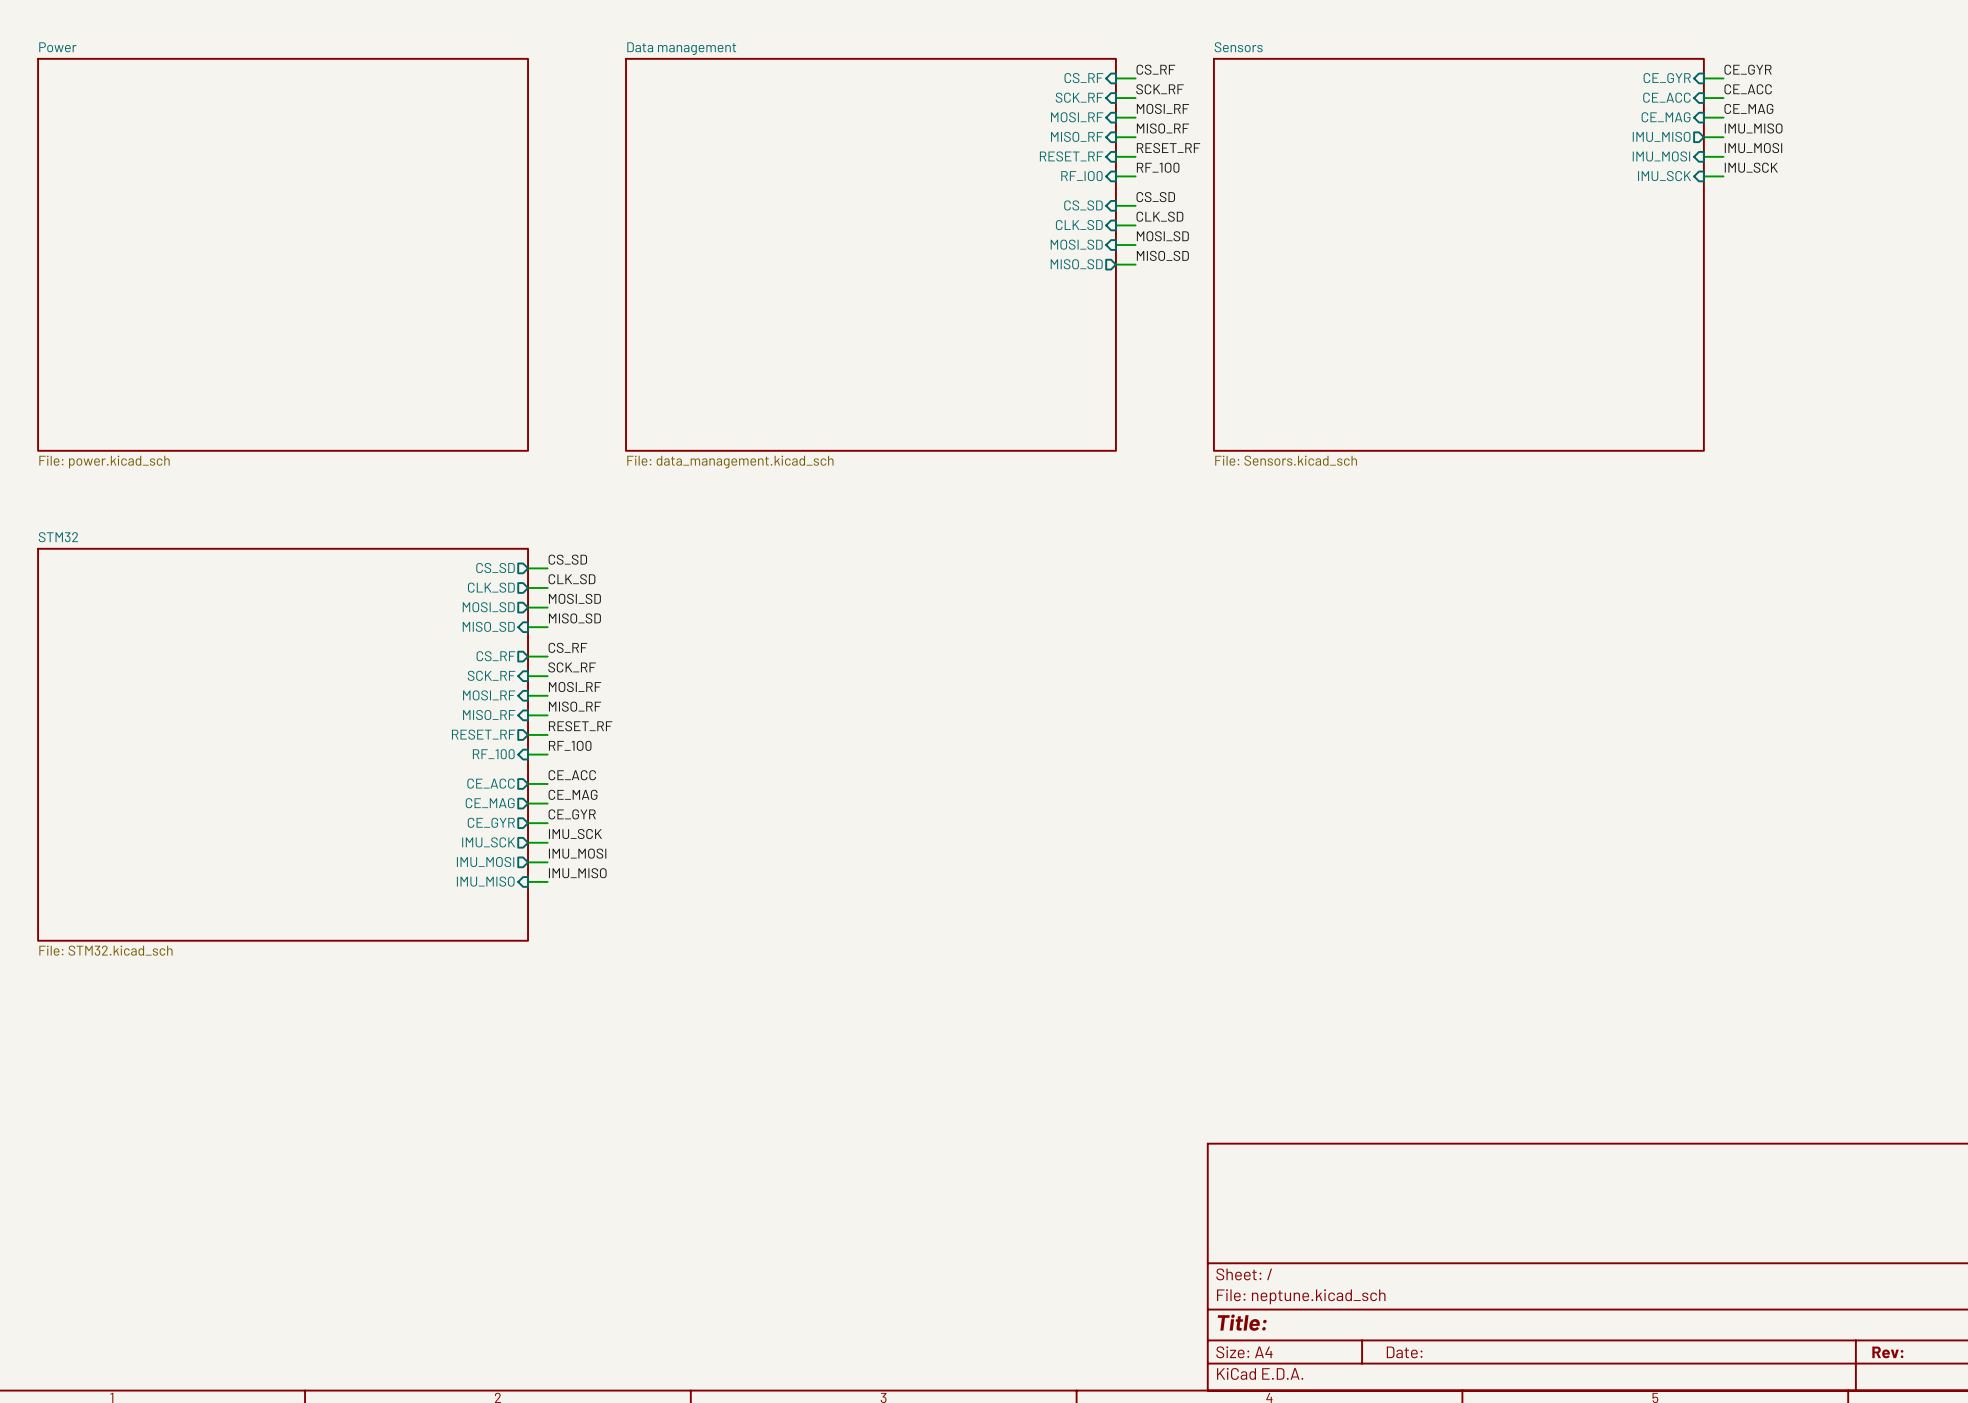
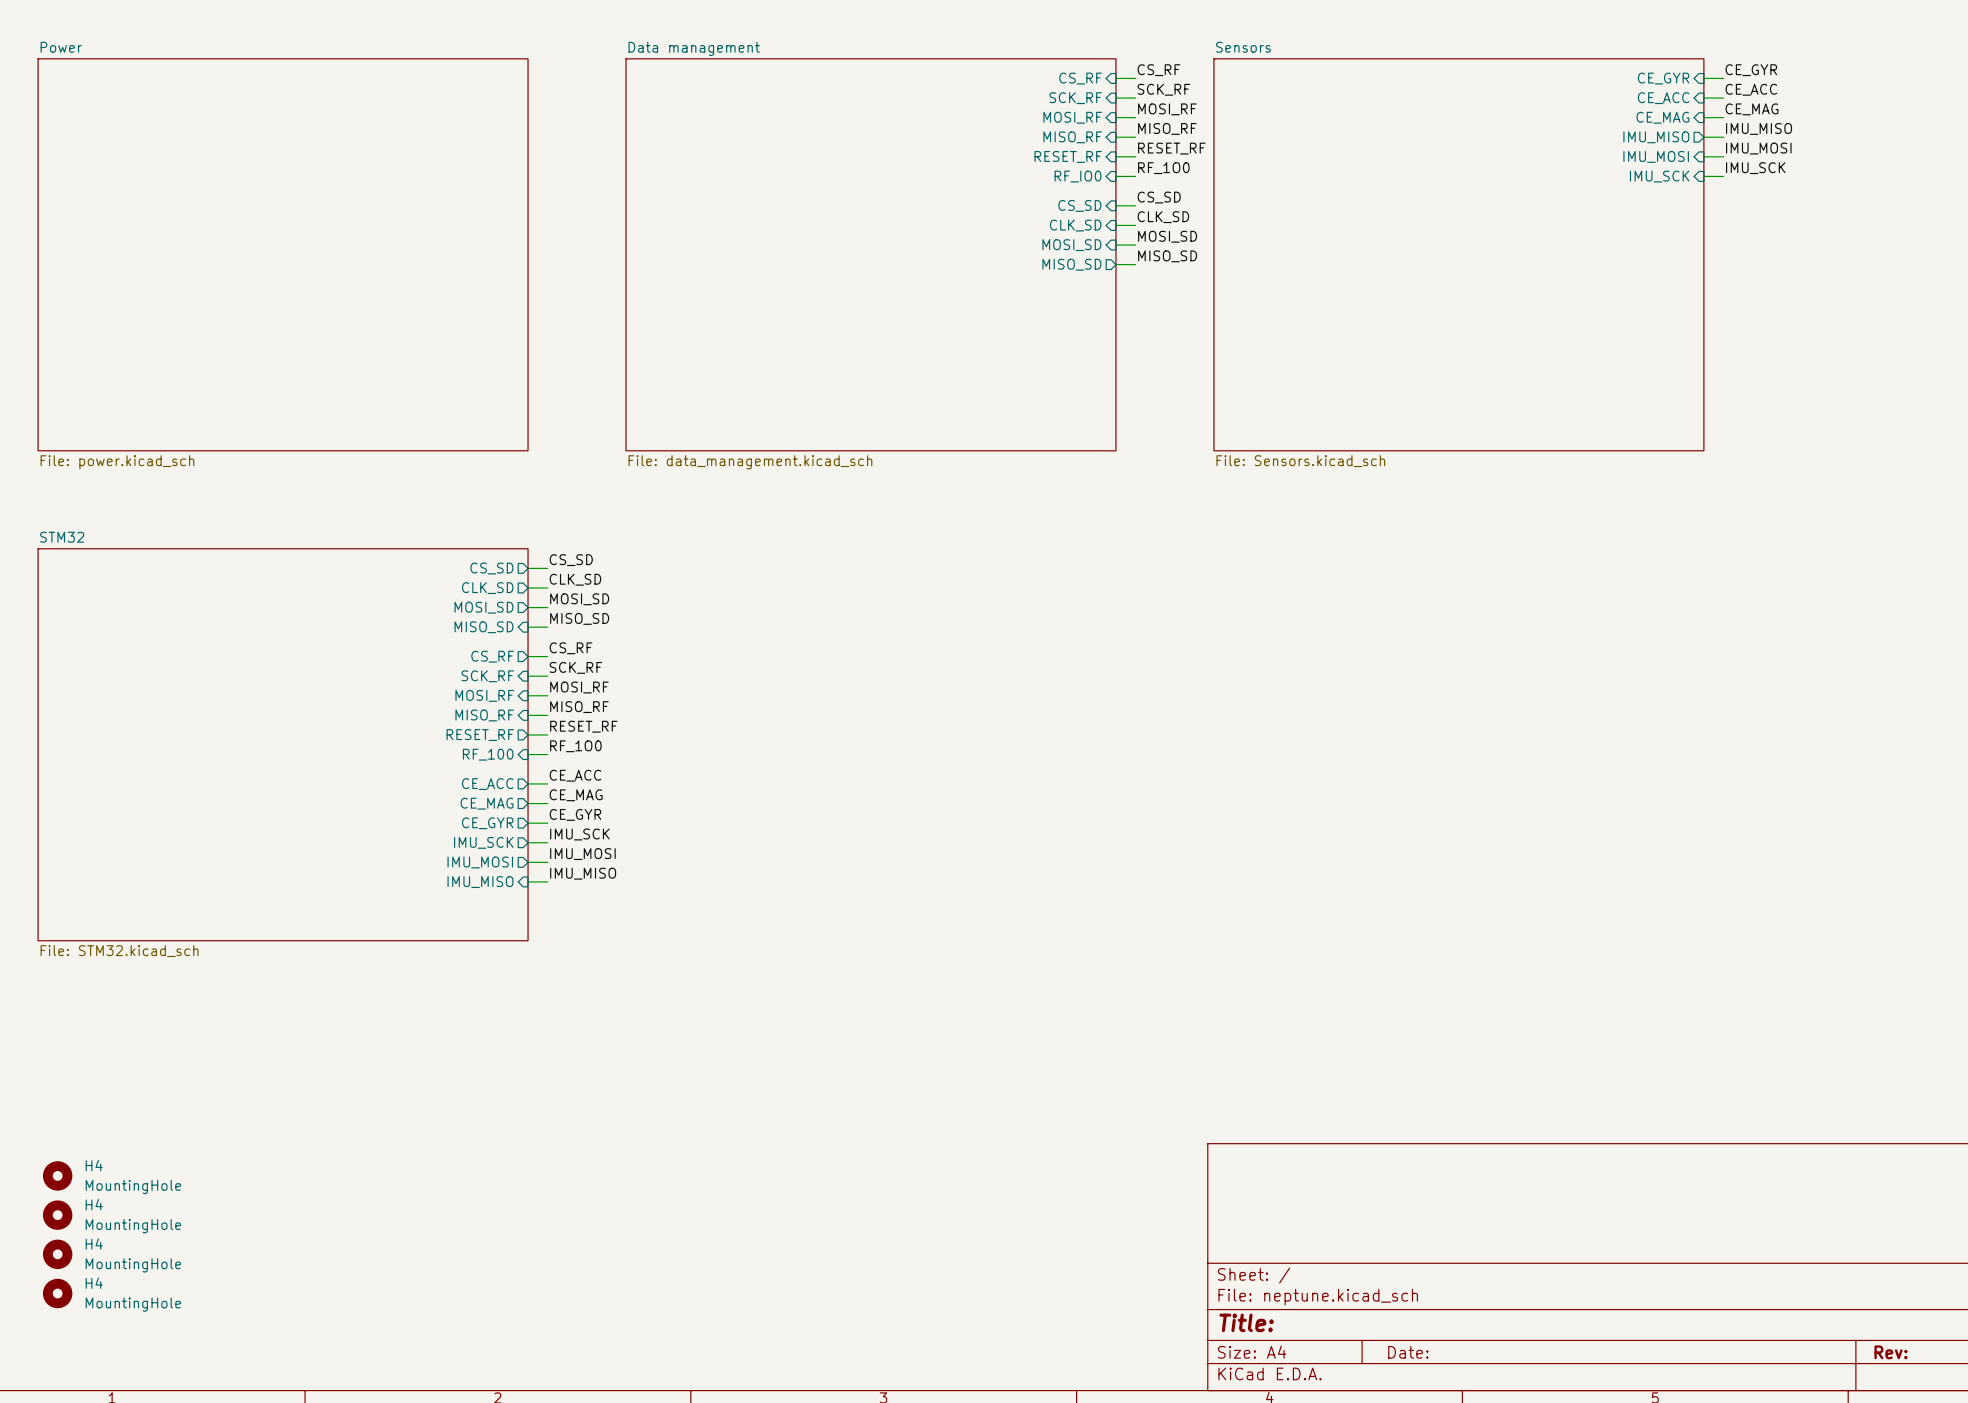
H4: none -> MountingHole (57, 1175)
H4: none -> MountingHole (57, 1215)
H4: none -> MountingHole (57, 1254)
H4: none -> MountingHole (57, 1293)

